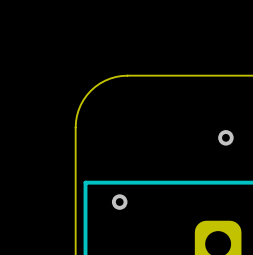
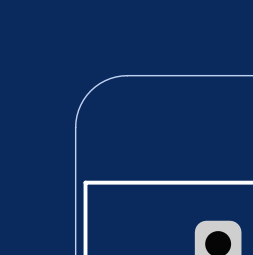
via: (225, 137) -> none
via: (119, 202) -> none

